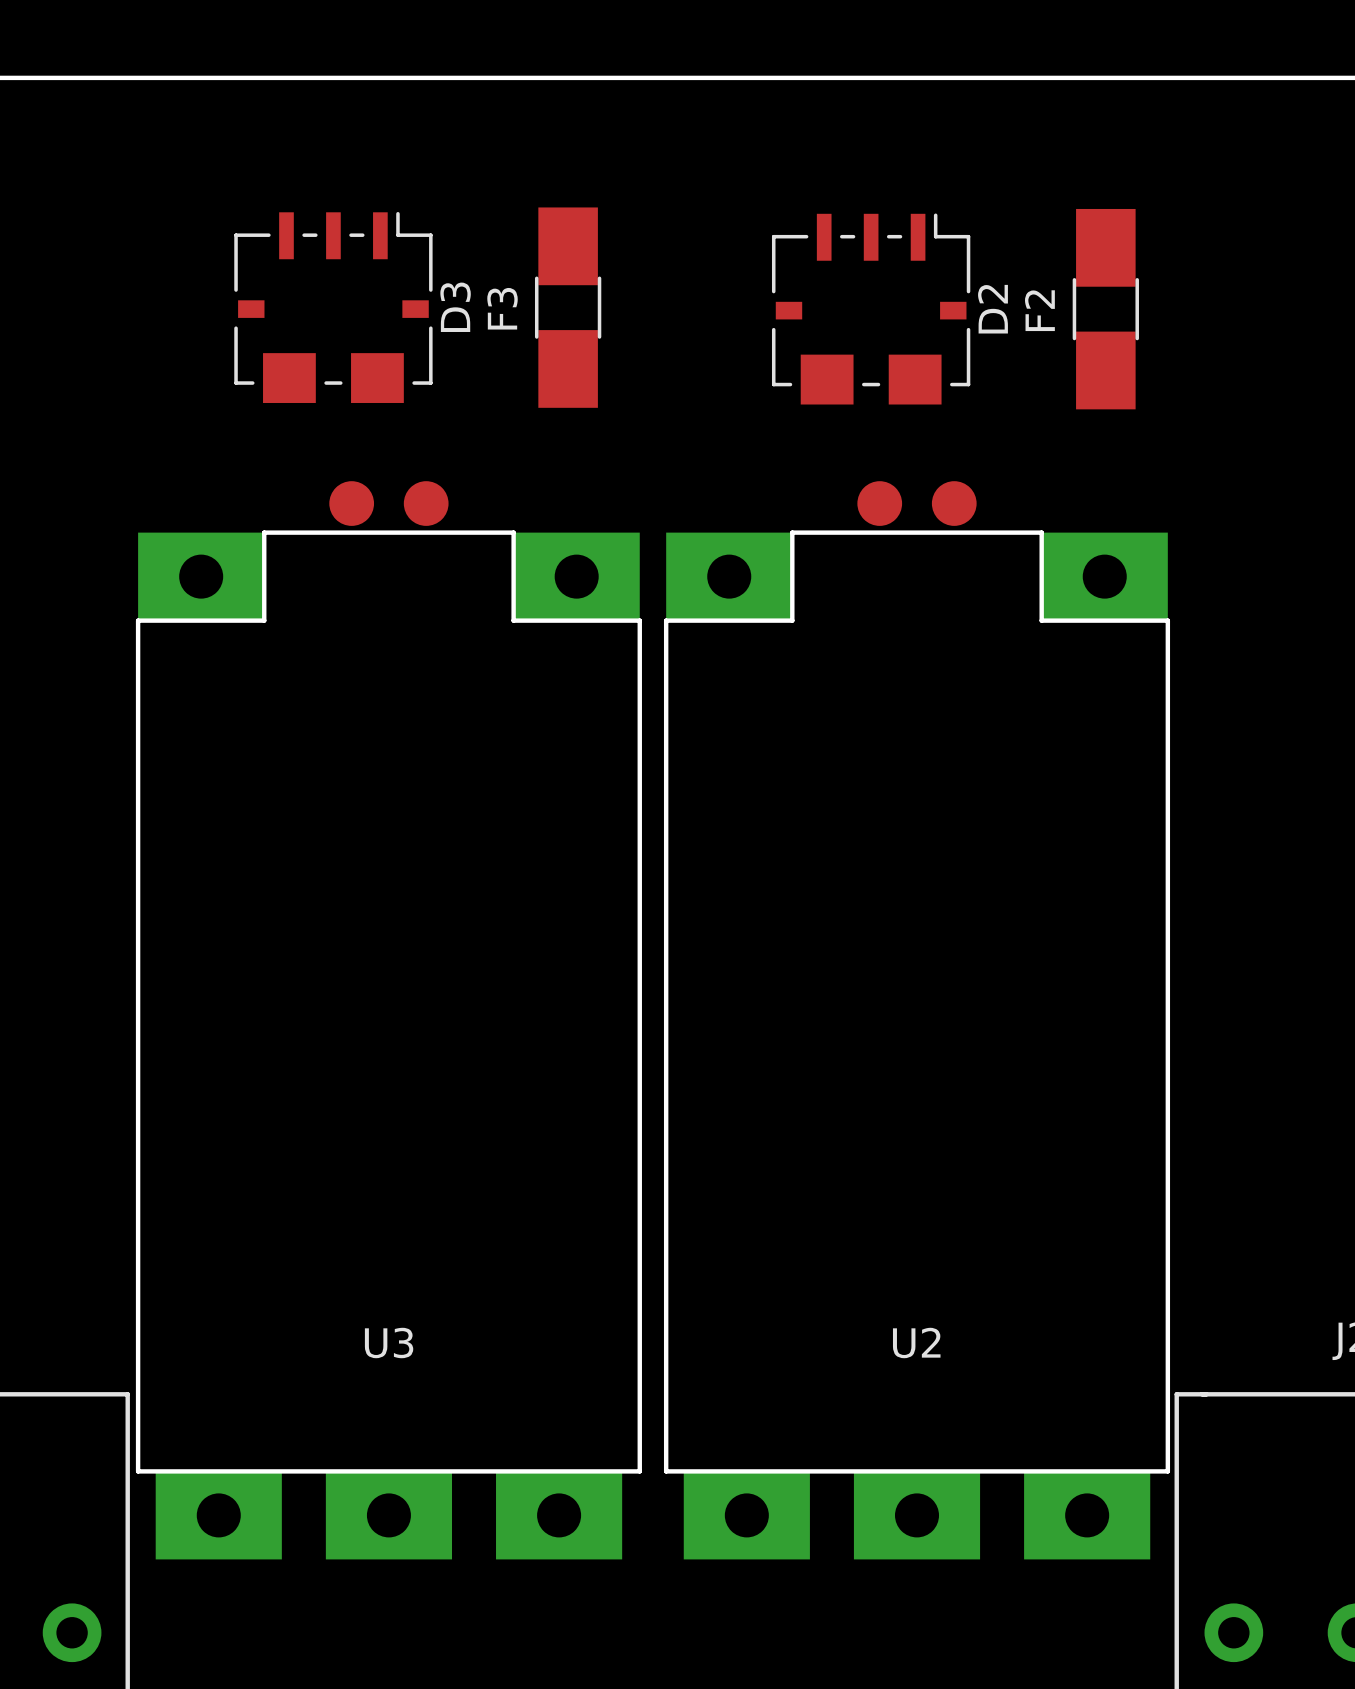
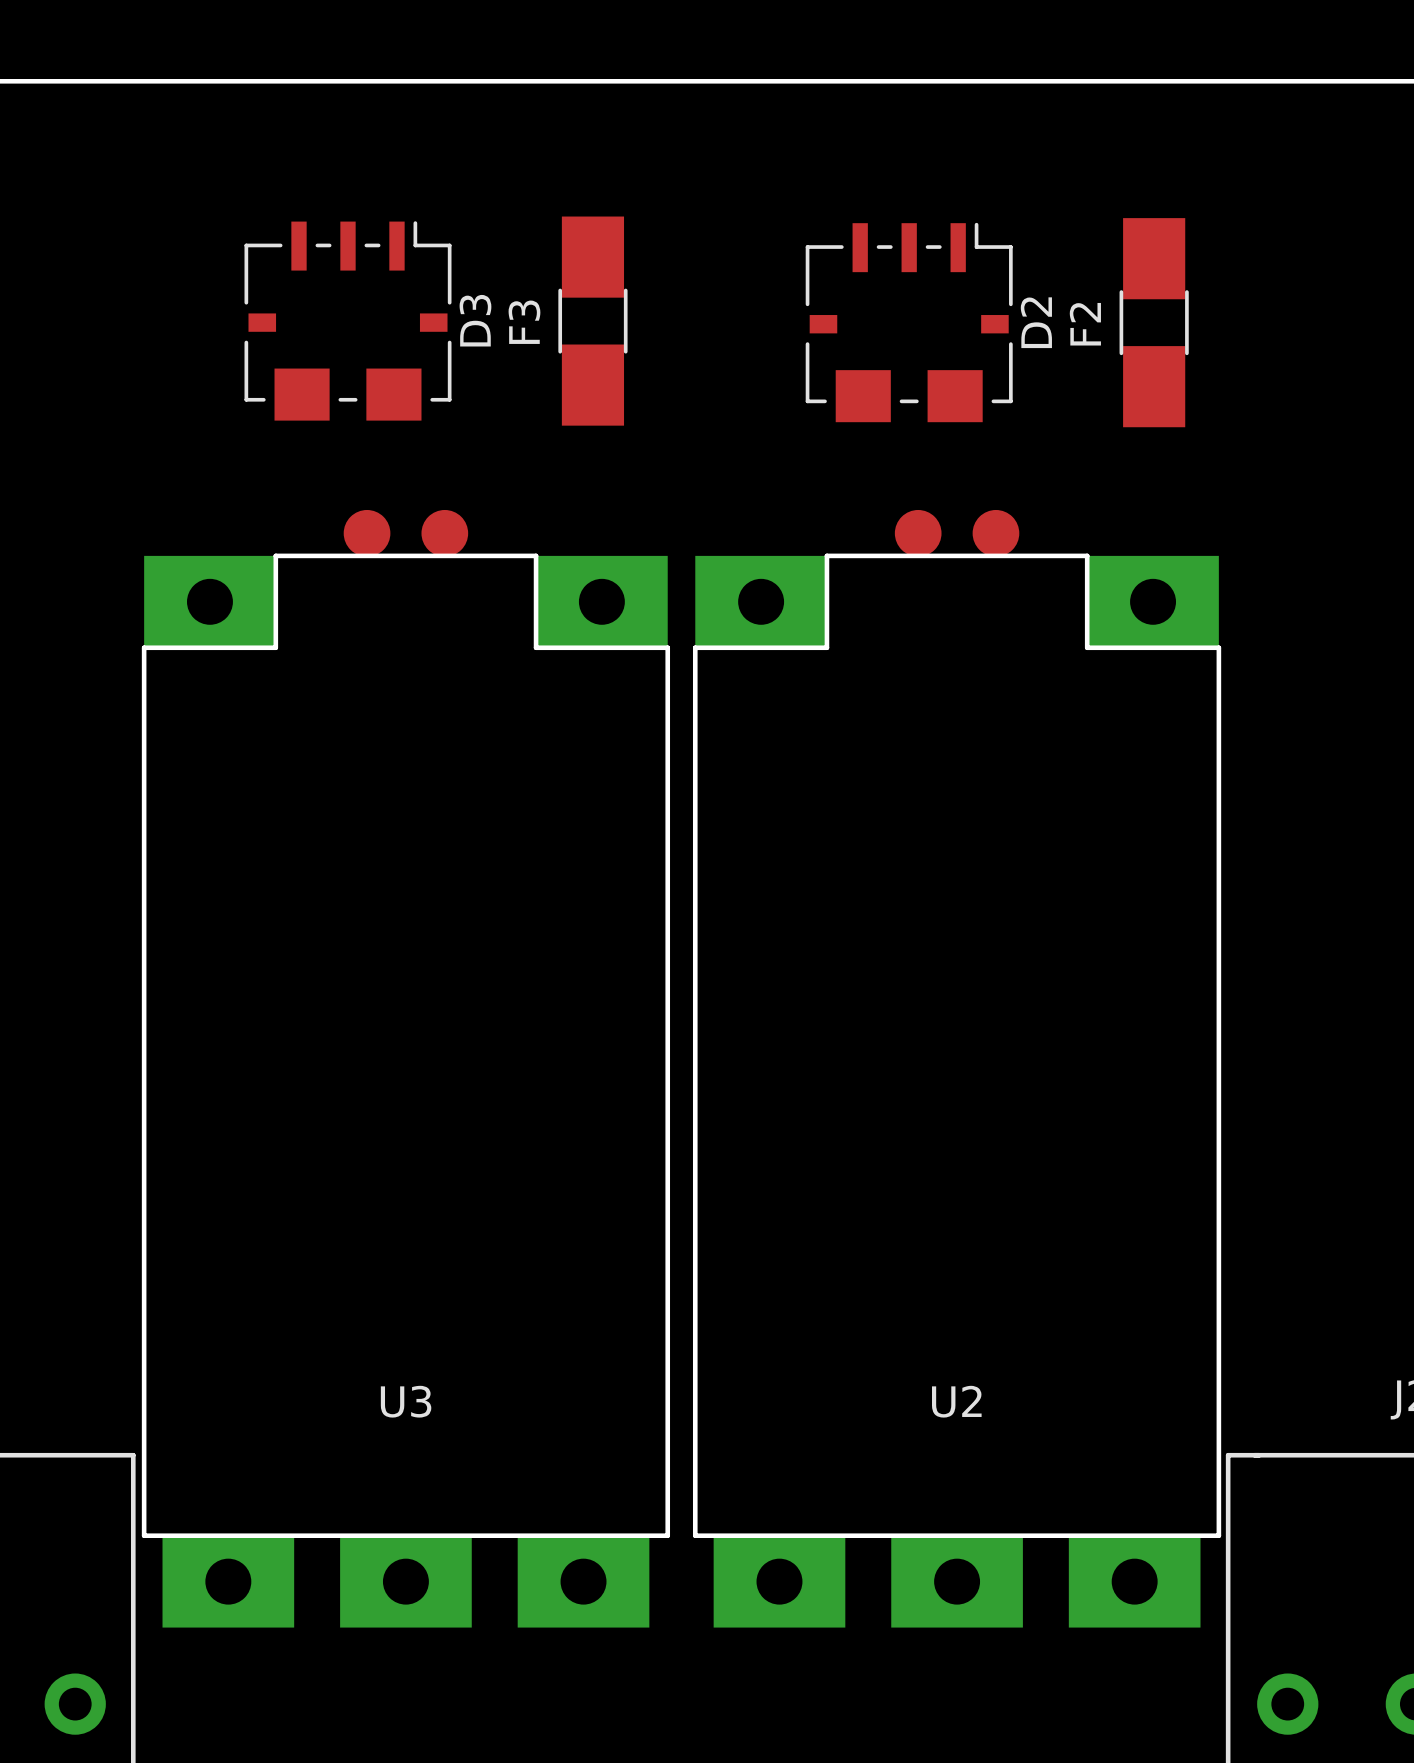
U3 footprint: [135, 481, 642, 1560] -> [141, 509, 671, 1628]
U2 footprint: [663, 481, 1171, 1560] -> [692, 509, 1222, 1628]

